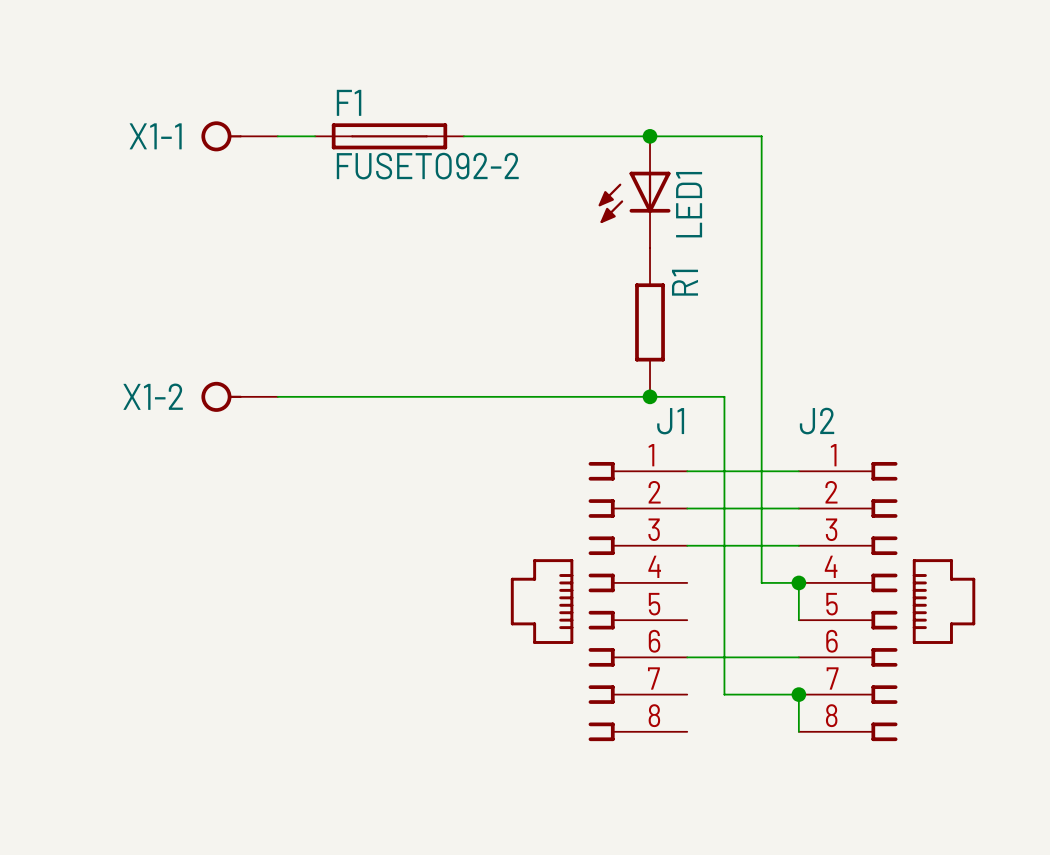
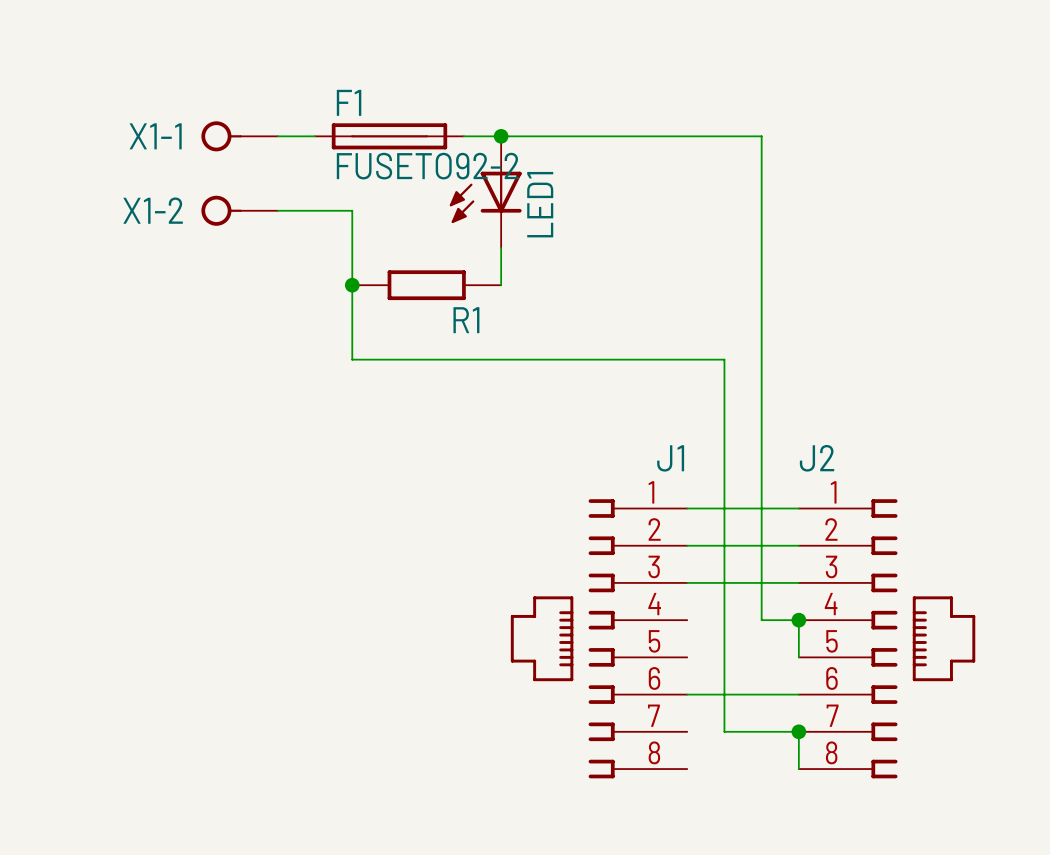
junction: none -> (501, 136)
junction: (650, 136) -> none
LED1 position: (634, 192) -> (485, 192)
wire: none -> (501, 247) (501, 285)
junction: none -> (352, 285)
R1 rotation: 0° (650, 322) -> 90° clockwise (426, 285)
R1 position: (650, 322) -> (426, 285)
X1-2 position: (239, 396) -> (239, 210)
wire: (277, 396) (724, 396) -> (277, 210) (352, 210) (352, 359) (724, 359) (724, 396)
junction: (650, 396) -> none
wire: (687, 471) (798, 471) -> none
wire: (798, 582) (798, 620) -> none
junction: (798, 582) -> none
J1 position: (599, 601) -> (599, 638)
J2 position: (887, 601) -> (887, 638)
junction: none -> (798, 620)
wire: (687, 657) (798, 657) -> (687, 582) (761, 582) (761, 620) (798, 620) (798, 657)
wire: none -> (687, 694) (724, 694) (724, 731) (798, 731) (798, 769)
wire: (798, 694) (798, 731) -> none
junction: (798, 694) -> none
junction: none -> (798, 731)

